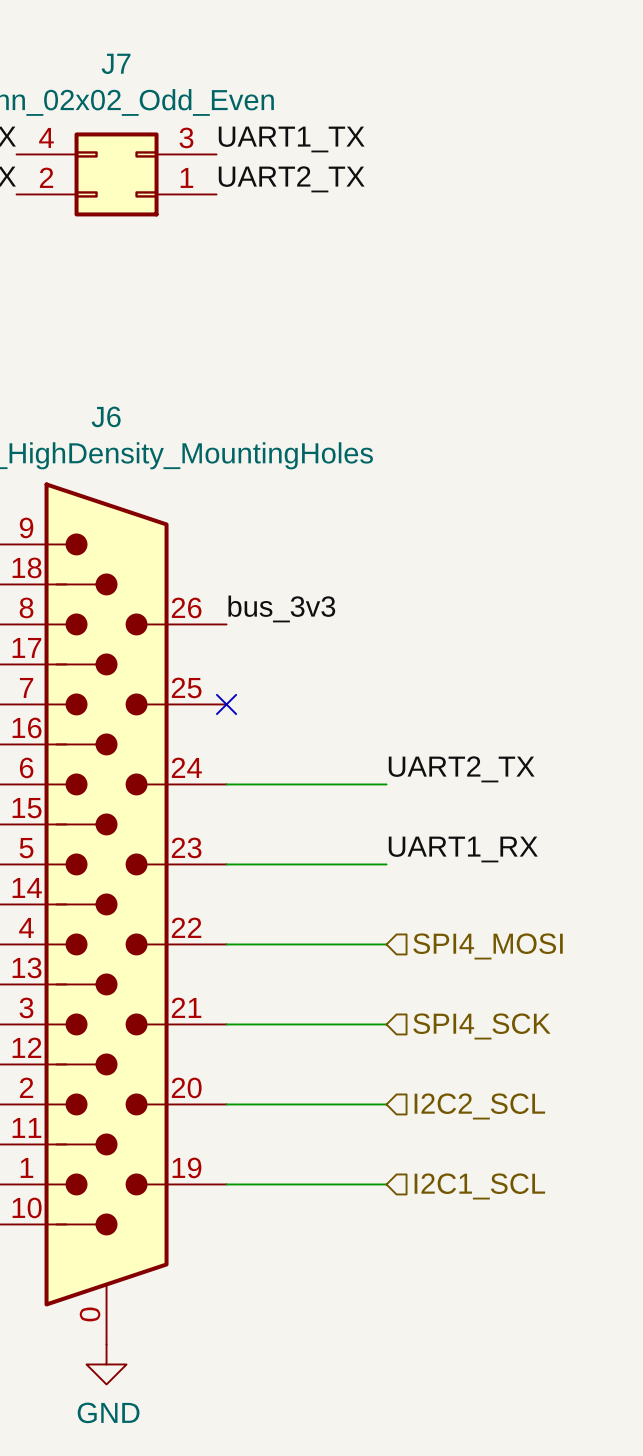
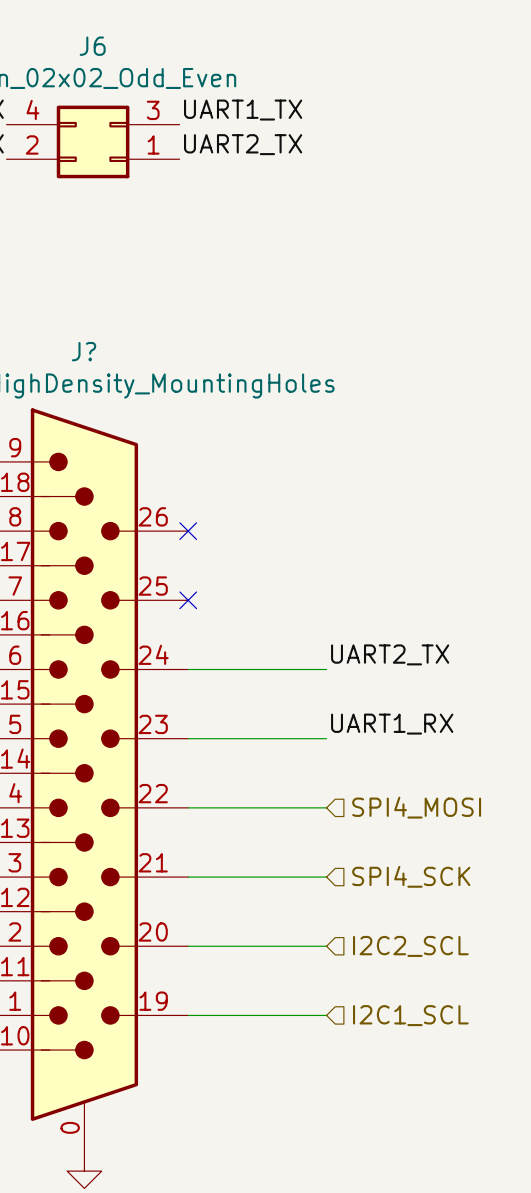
J7 name: J7 (116, 63) -> J6 (92, 46)
J6 name: J6 (106, 416) -> J? (84, 351)
label: bus_3v3 (281, 608) -> none
no-connect mark: none -> (188, 531)

